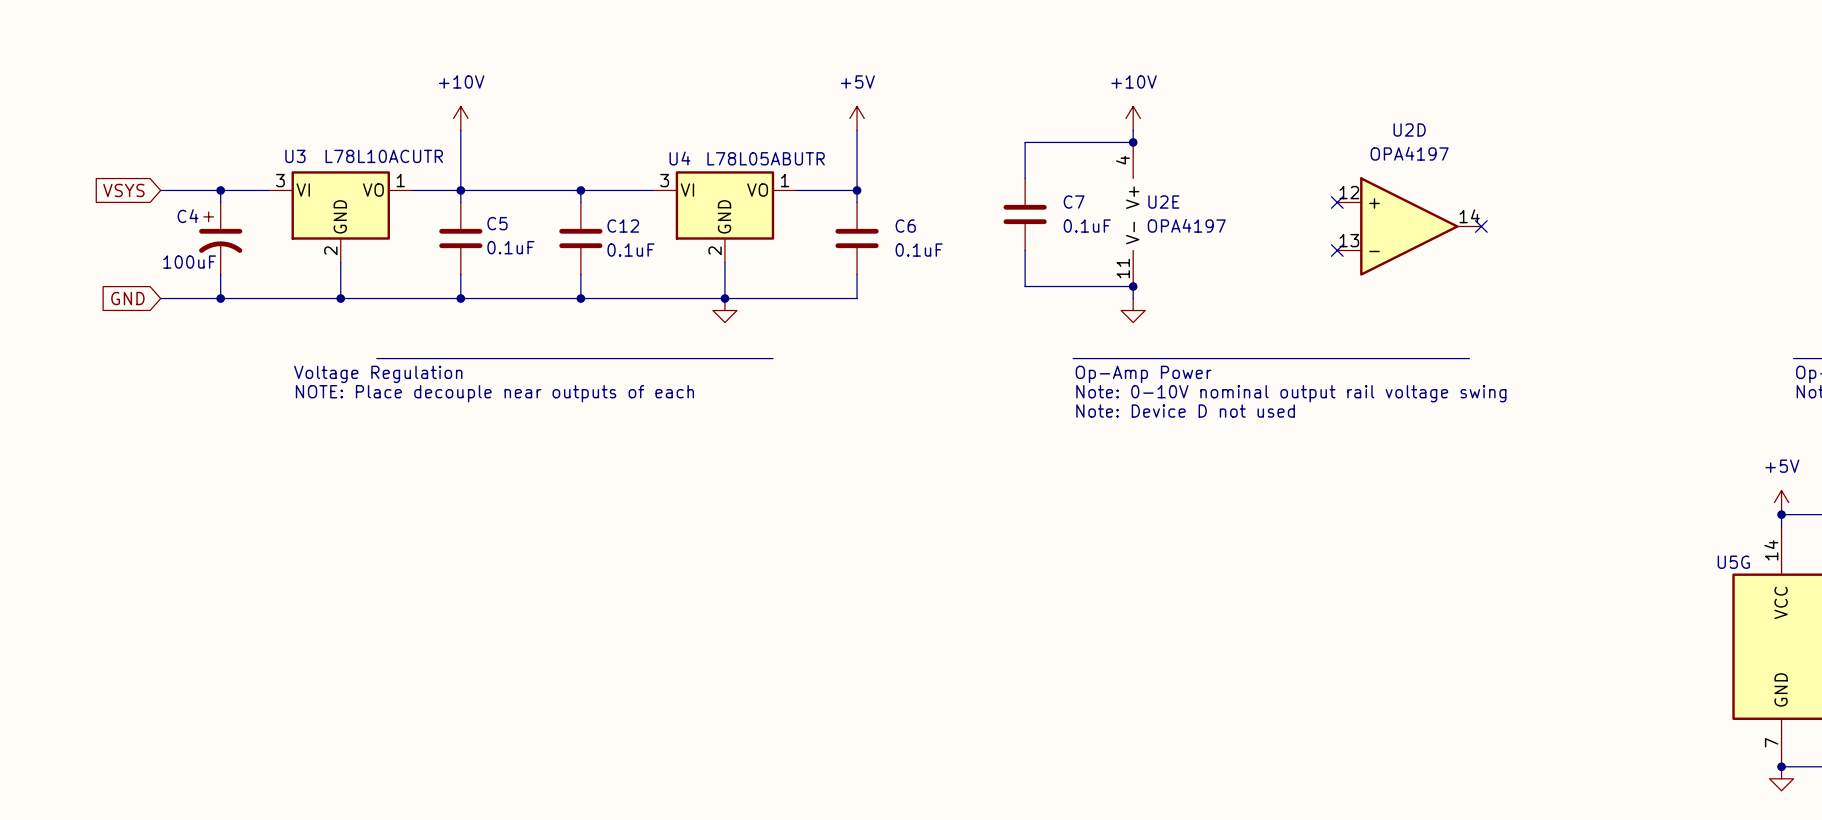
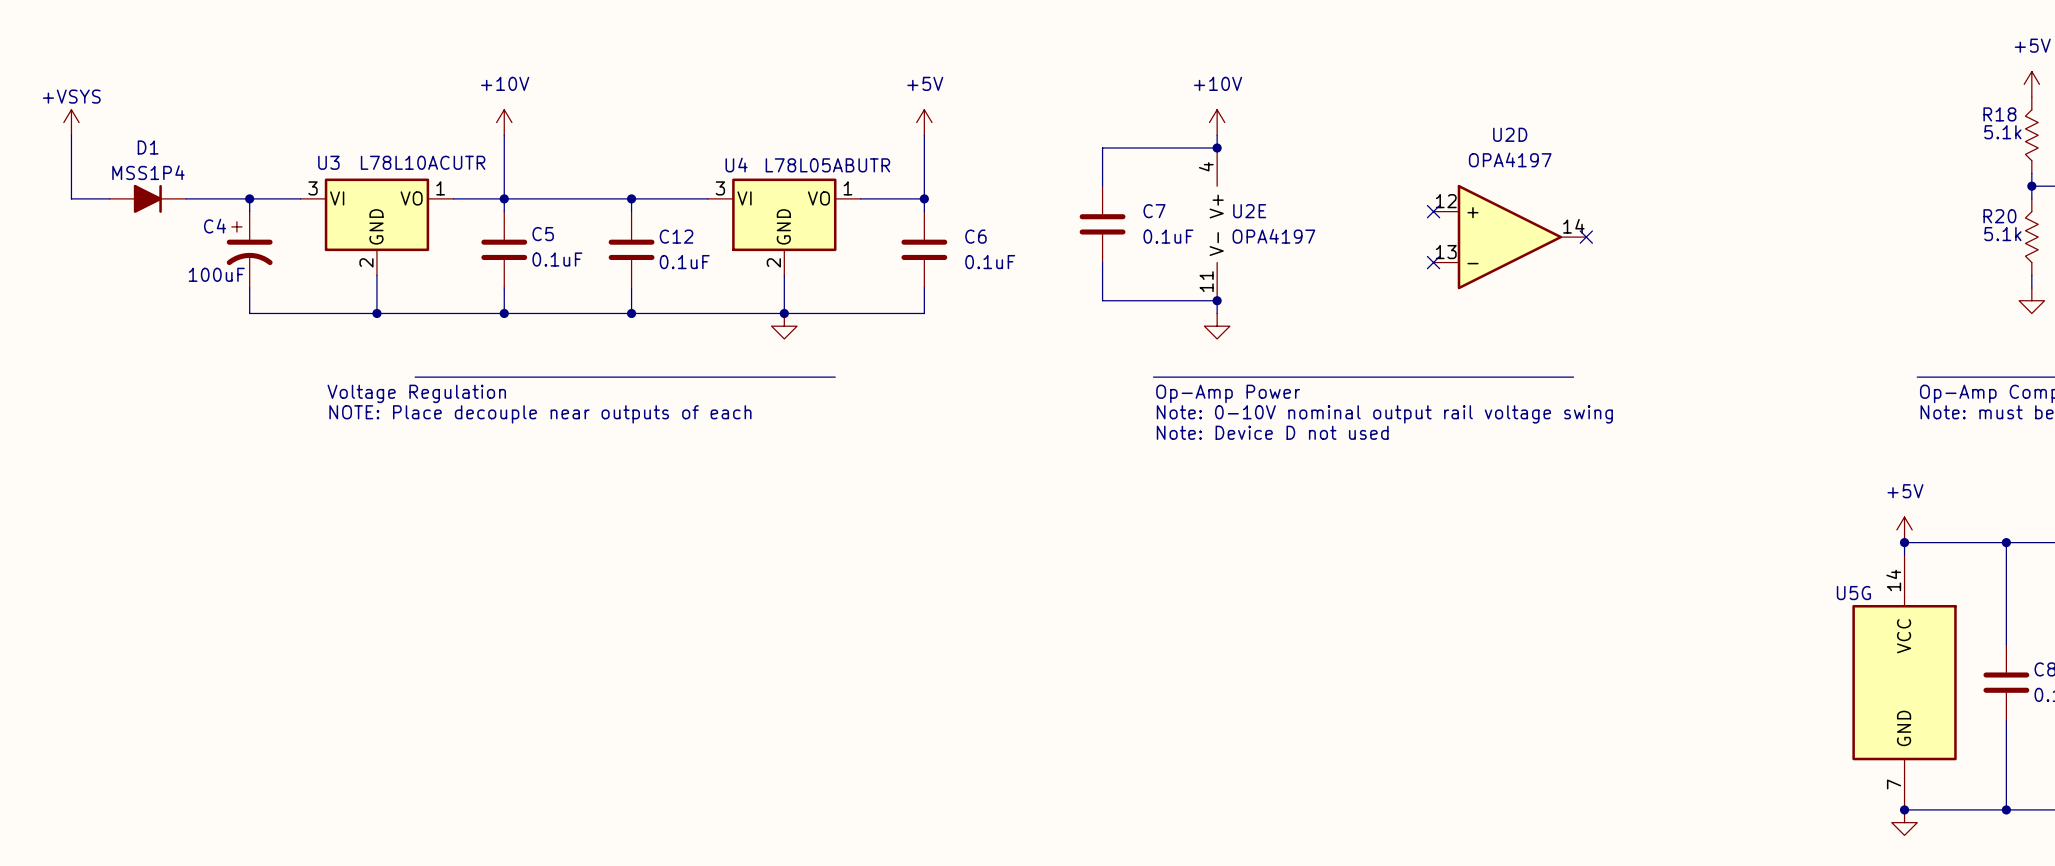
power symbol: none -> +VSYS (71, 122)
wire: none -> (71, 135) (71, 198) (109, 198)
global label: VSYS (123, 190) -> none
D1: none -> MSS1P4 (147, 198)
global label: GND (127, 298) -> none
wire: (160, 298) (220, 298) -> none
junction: (220, 298) -> none

